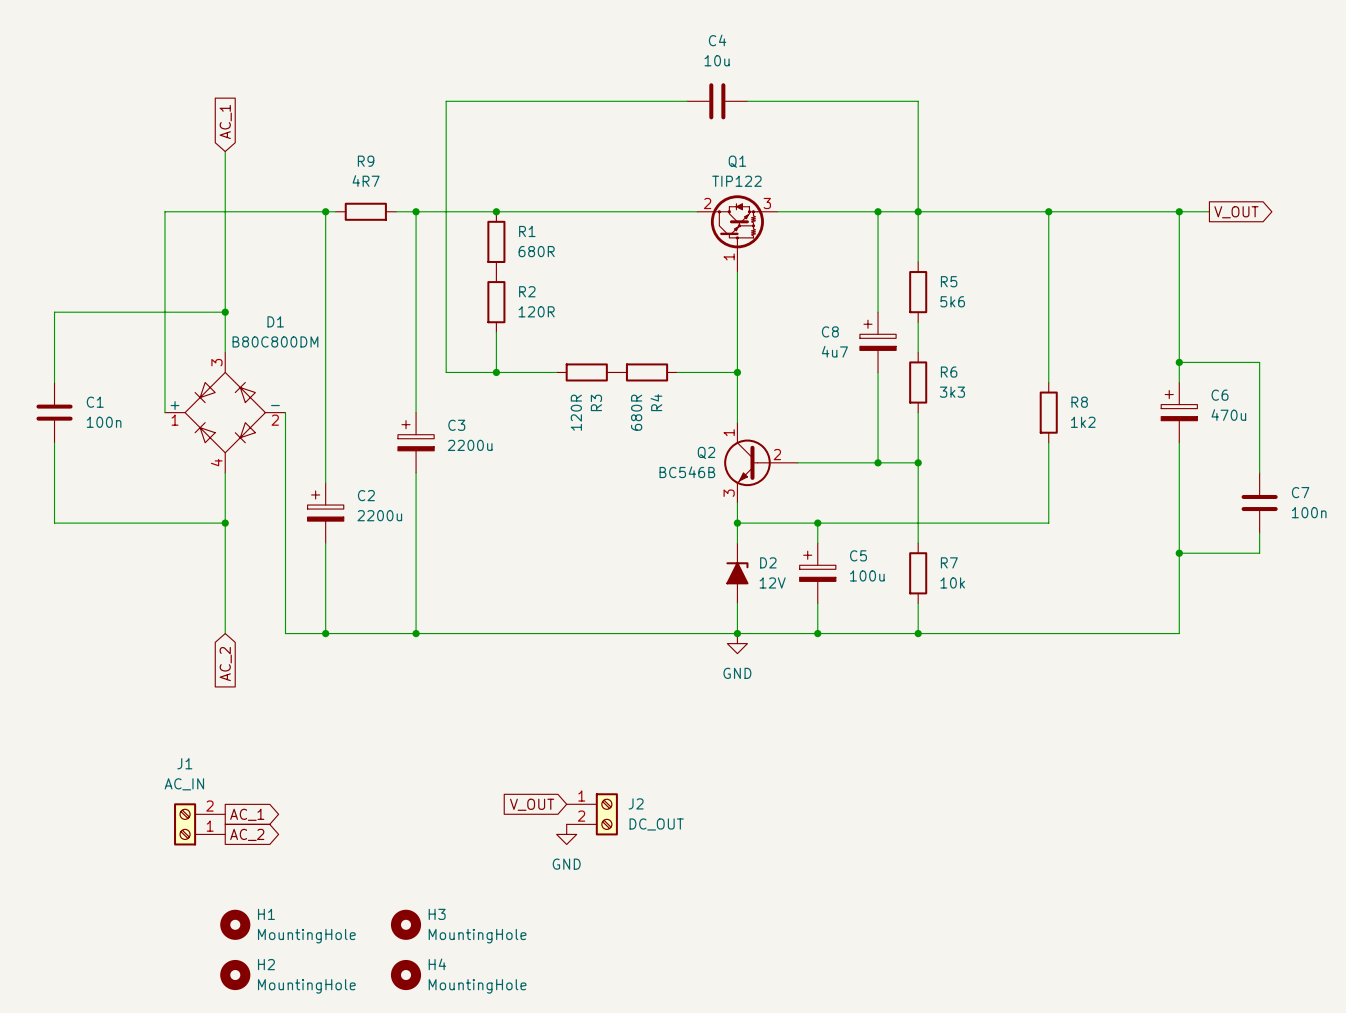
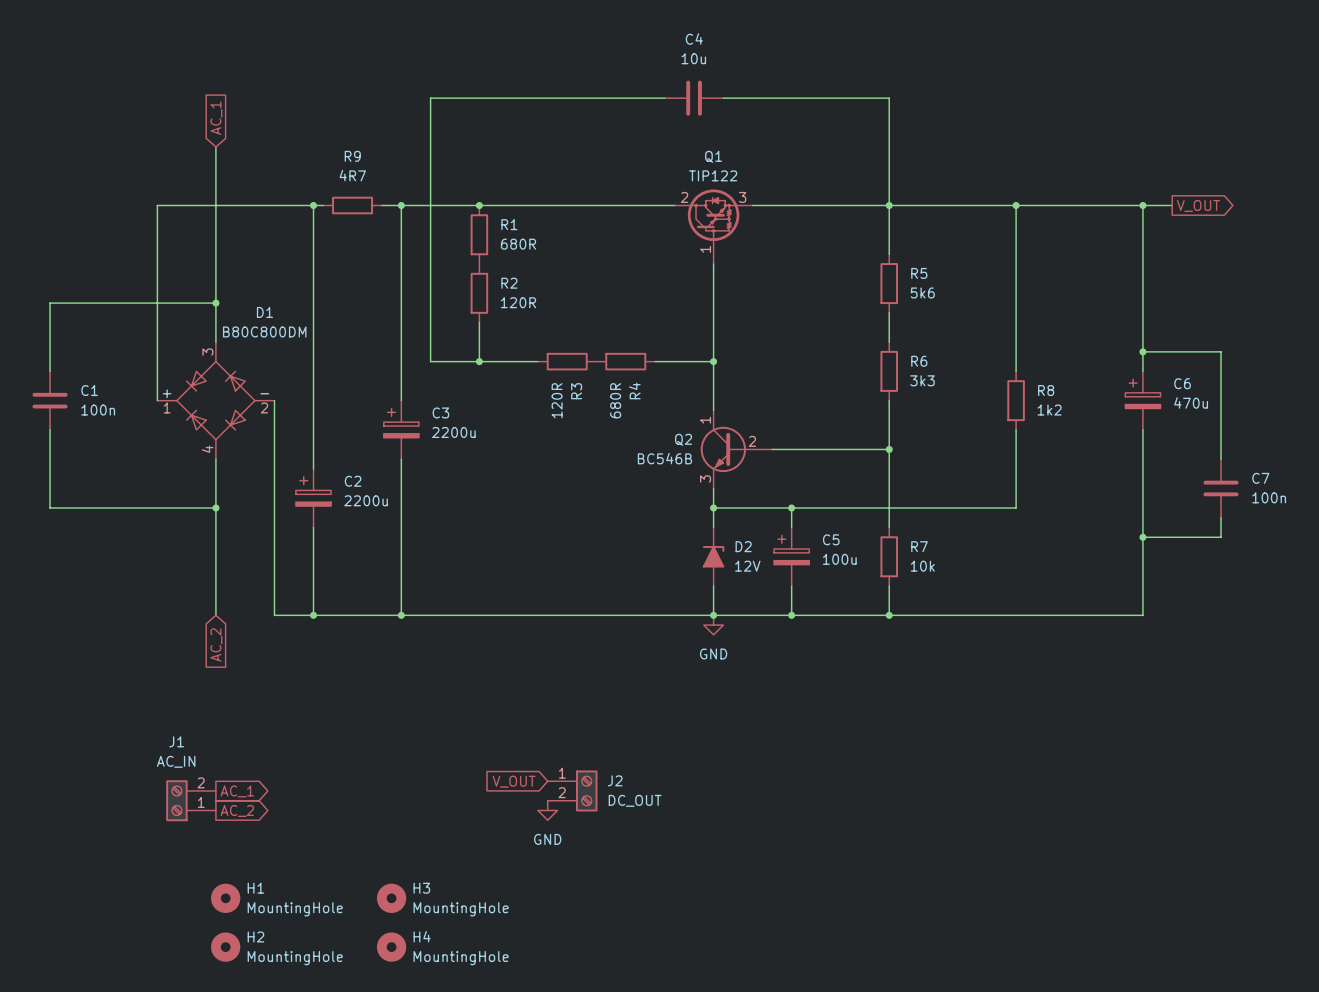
wire: (878, 211) (878, 312) -> none
junction: (878, 211) -> none
C8: 4u7 (878, 342) -> none
wire: (878, 372) (878, 462) -> none
junction: (878, 462) -> none

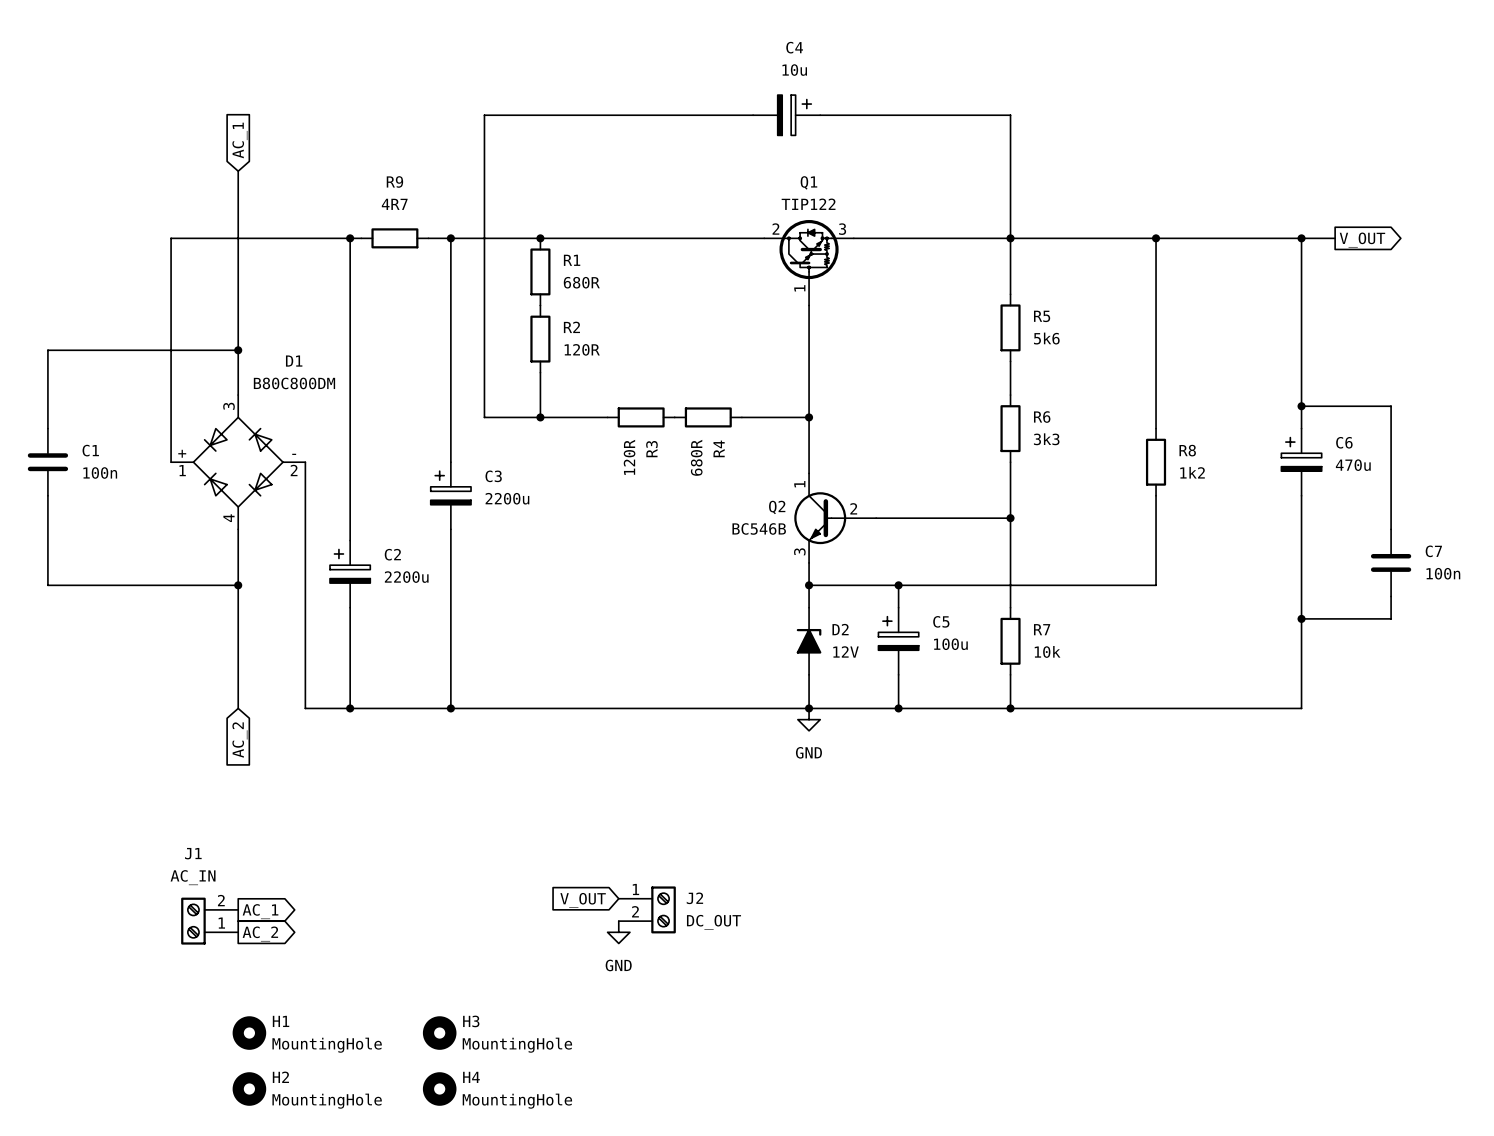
C4 symbol: [664, 80, 724, 116] -> [753, 95, 821, 136]

